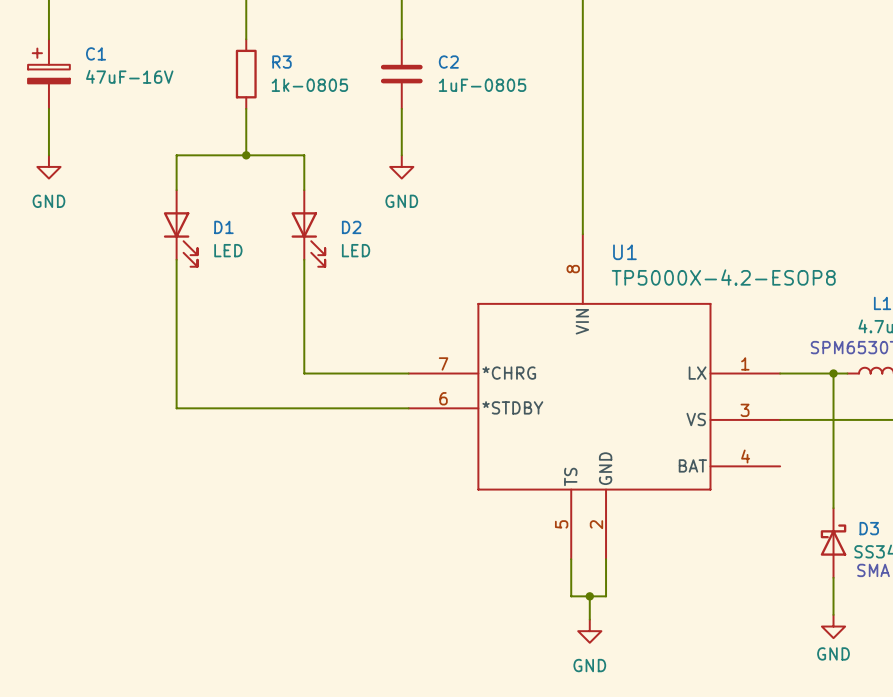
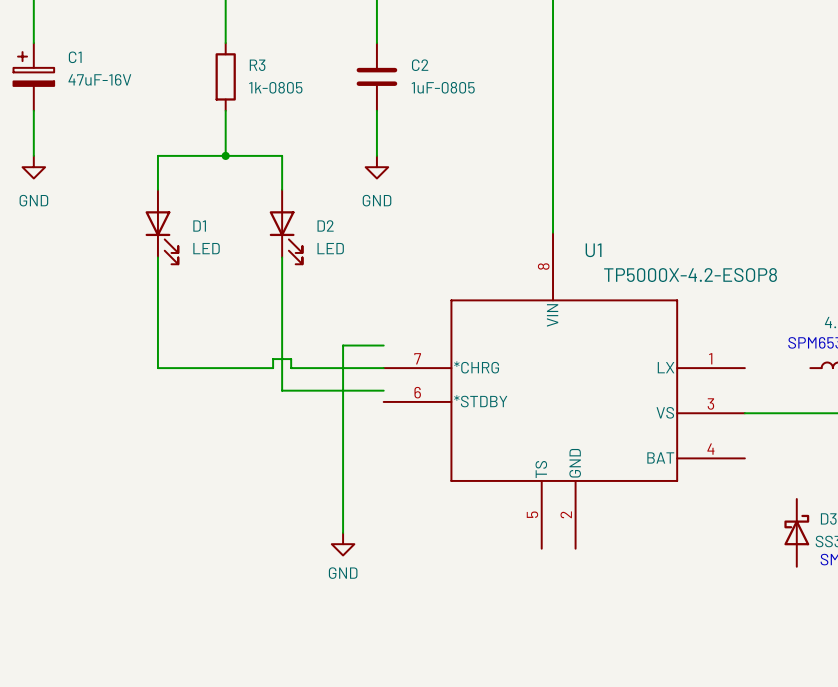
wire: none -> (383, 345) (343, 345) (343, 532)
wire: (176, 373) (176, 408) (408, 408) -> (157, 368) (273, 368) (273, 359) (291, 359) (291, 368)
wire: (304, 373) (313, 373) -> (282, 368) (282, 390) (383, 390)
wire: (780, 373) (847, 373) -> none
wire: (833, 373) (833, 508) -> none
junction: (833, 373) -> none
power symbol: none -> GND (343, 544)
wire: (571, 559) (571, 596) (606, 596) (606, 559) -> none
wire: (833, 577) (833, 614) -> none
wire: (589, 596) (589, 619) -> none
junction: (589, 596) -> none
power symbol: GND (833, 626) -> none
power symbol: GND (589, 631) -> none

